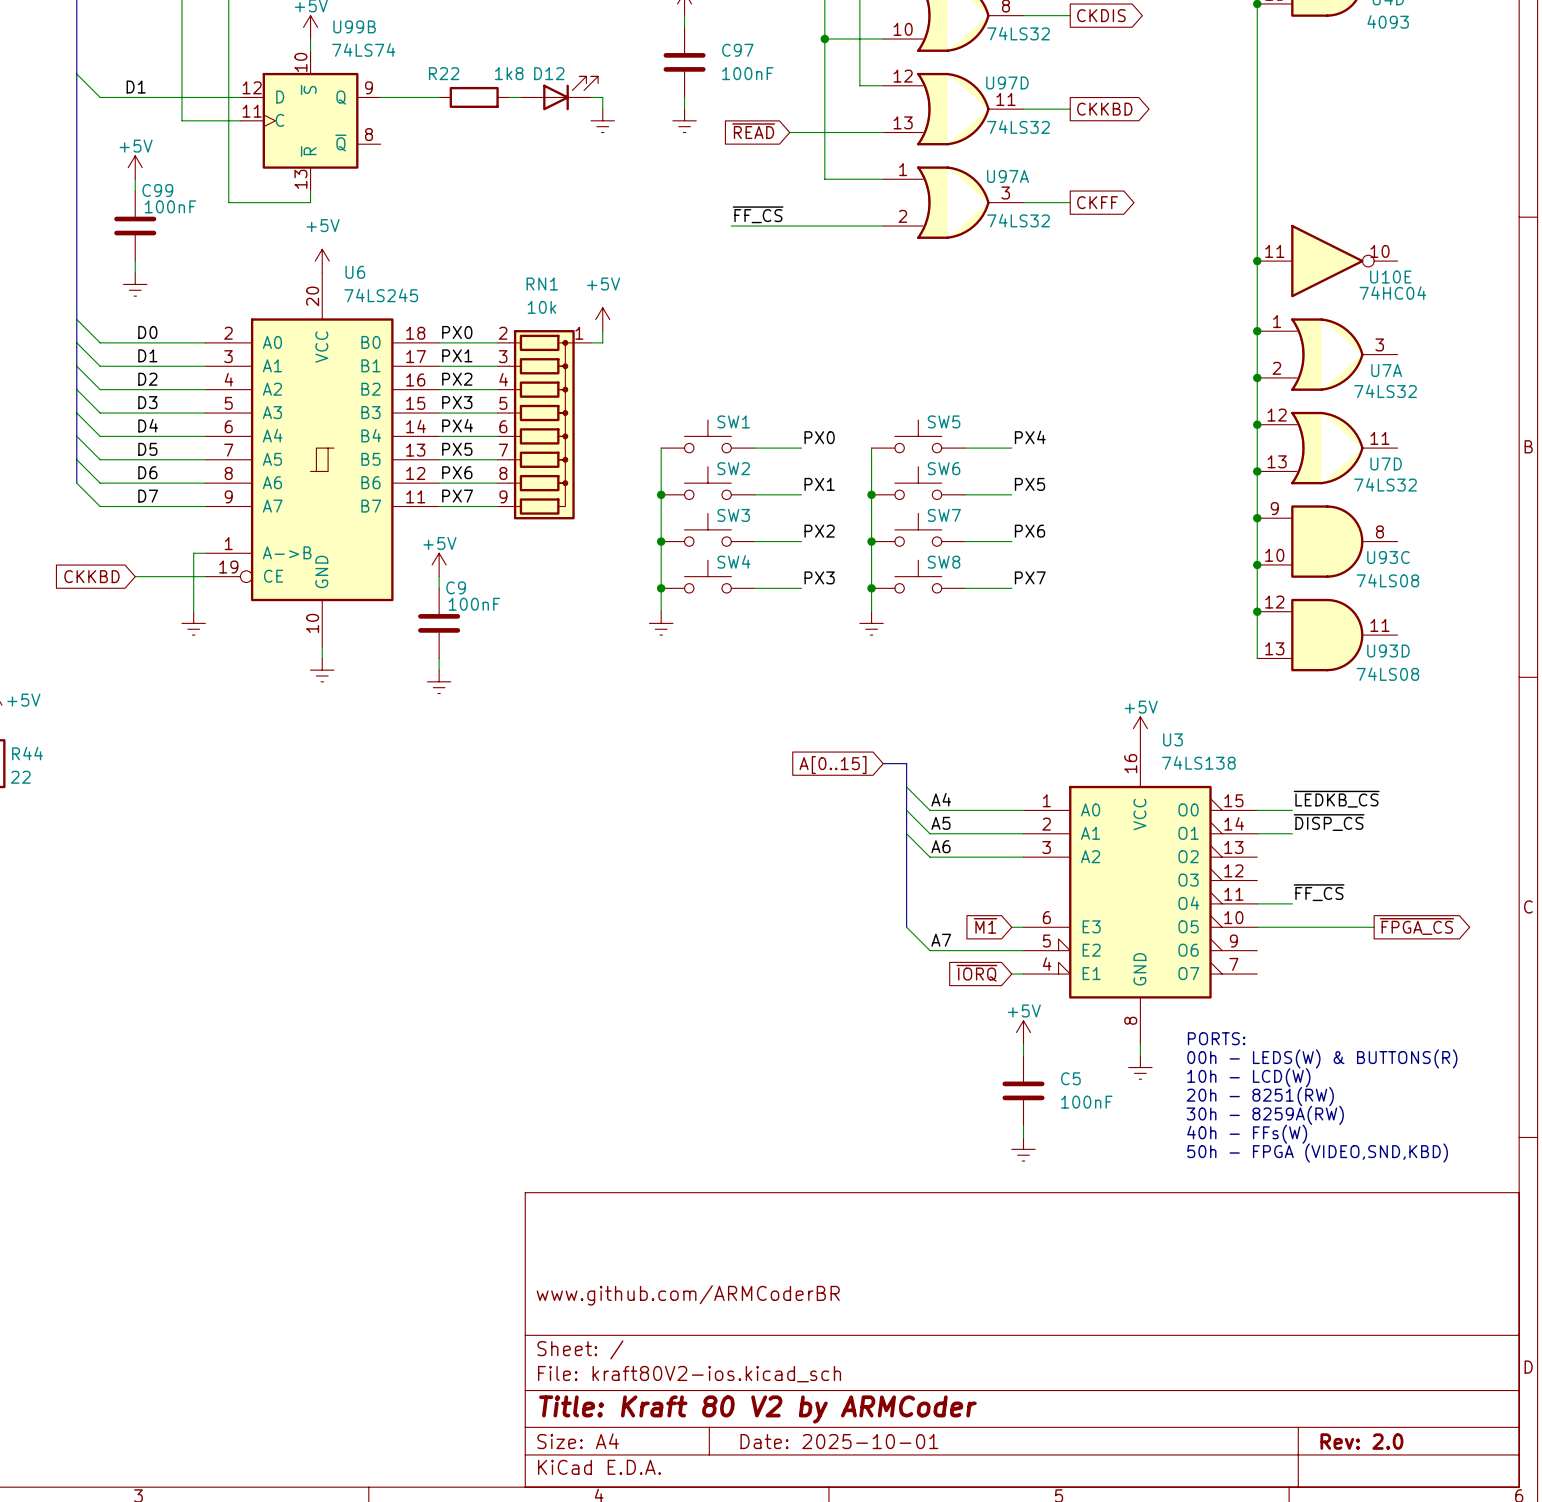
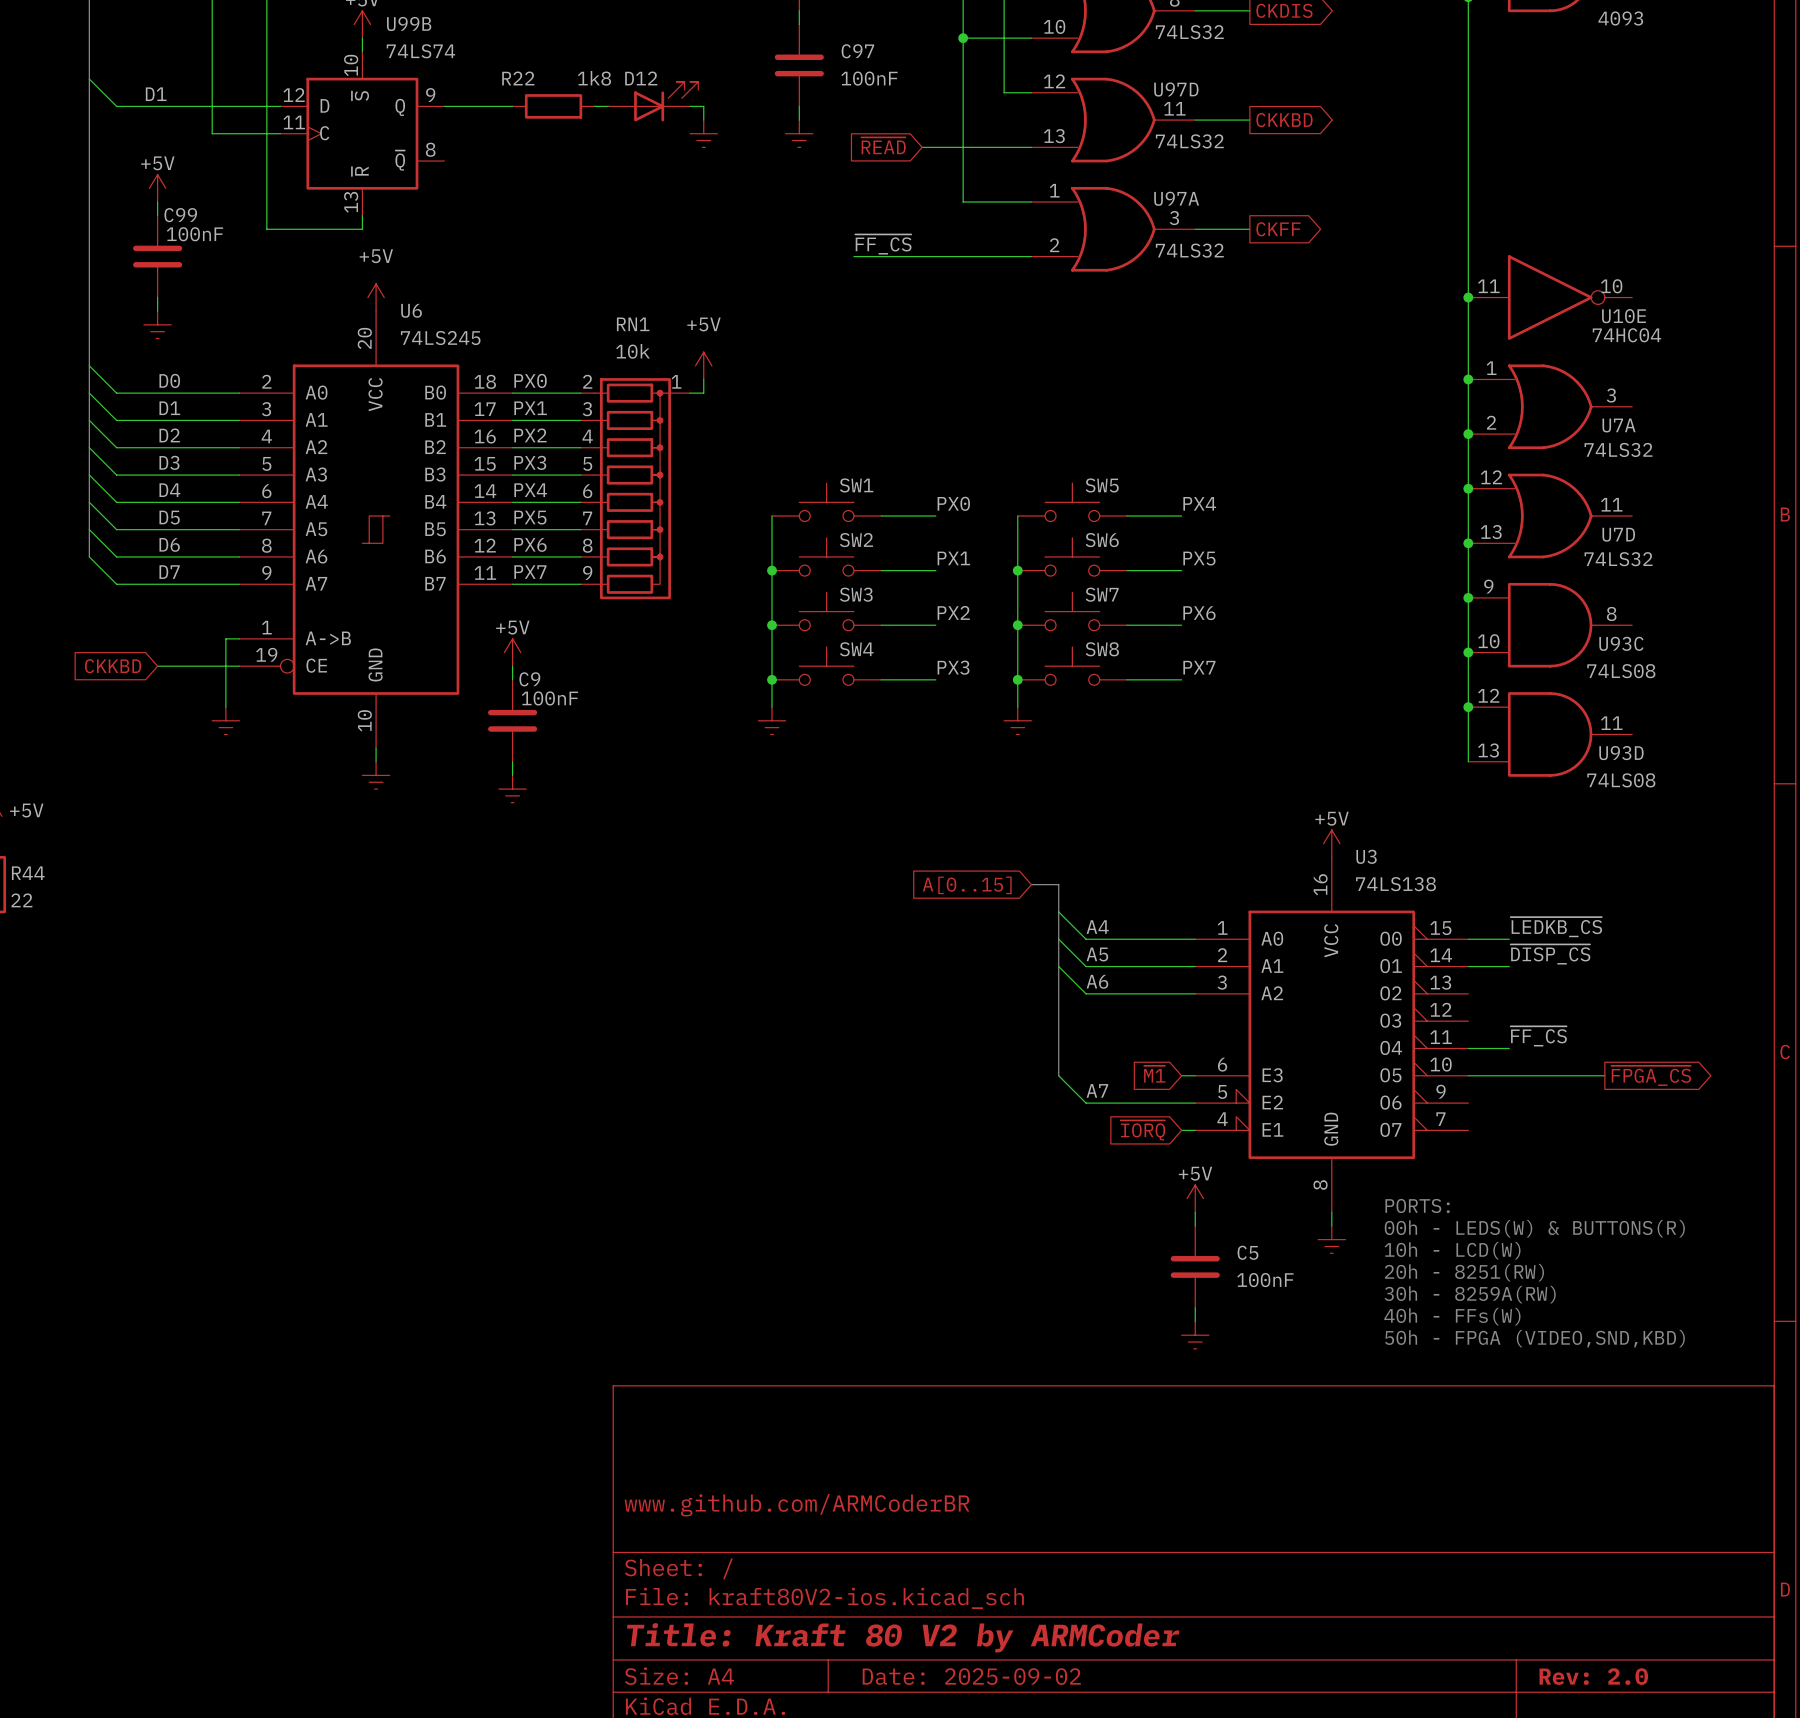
title block: Date: 2025-10-01 (839, 1441) -> Date: 2025-09-02 (971, 1676)

